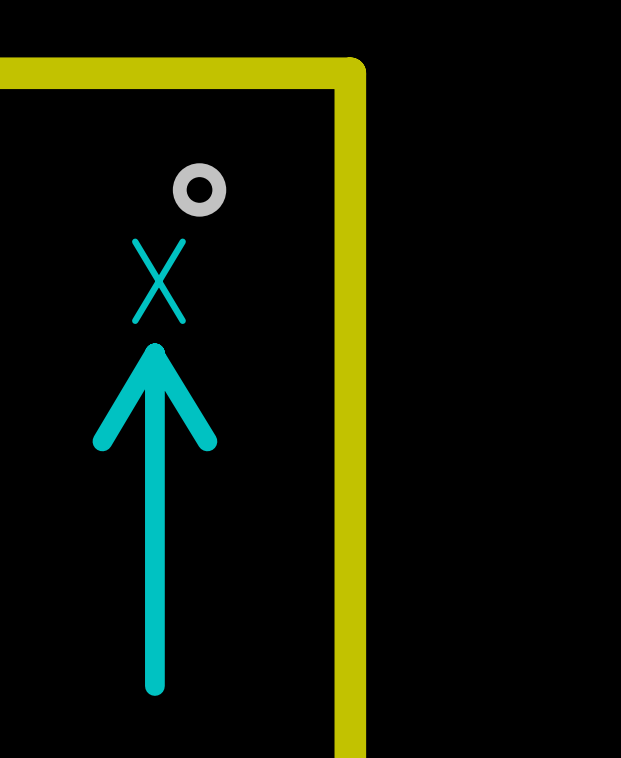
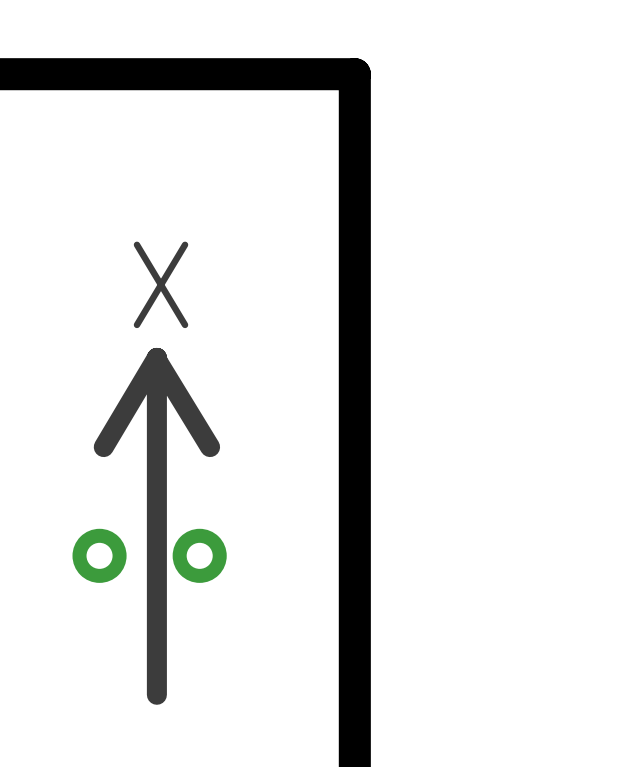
via: (199, 189) -> none
via: none -> (99, 555)
via: none -> (199, 555)

